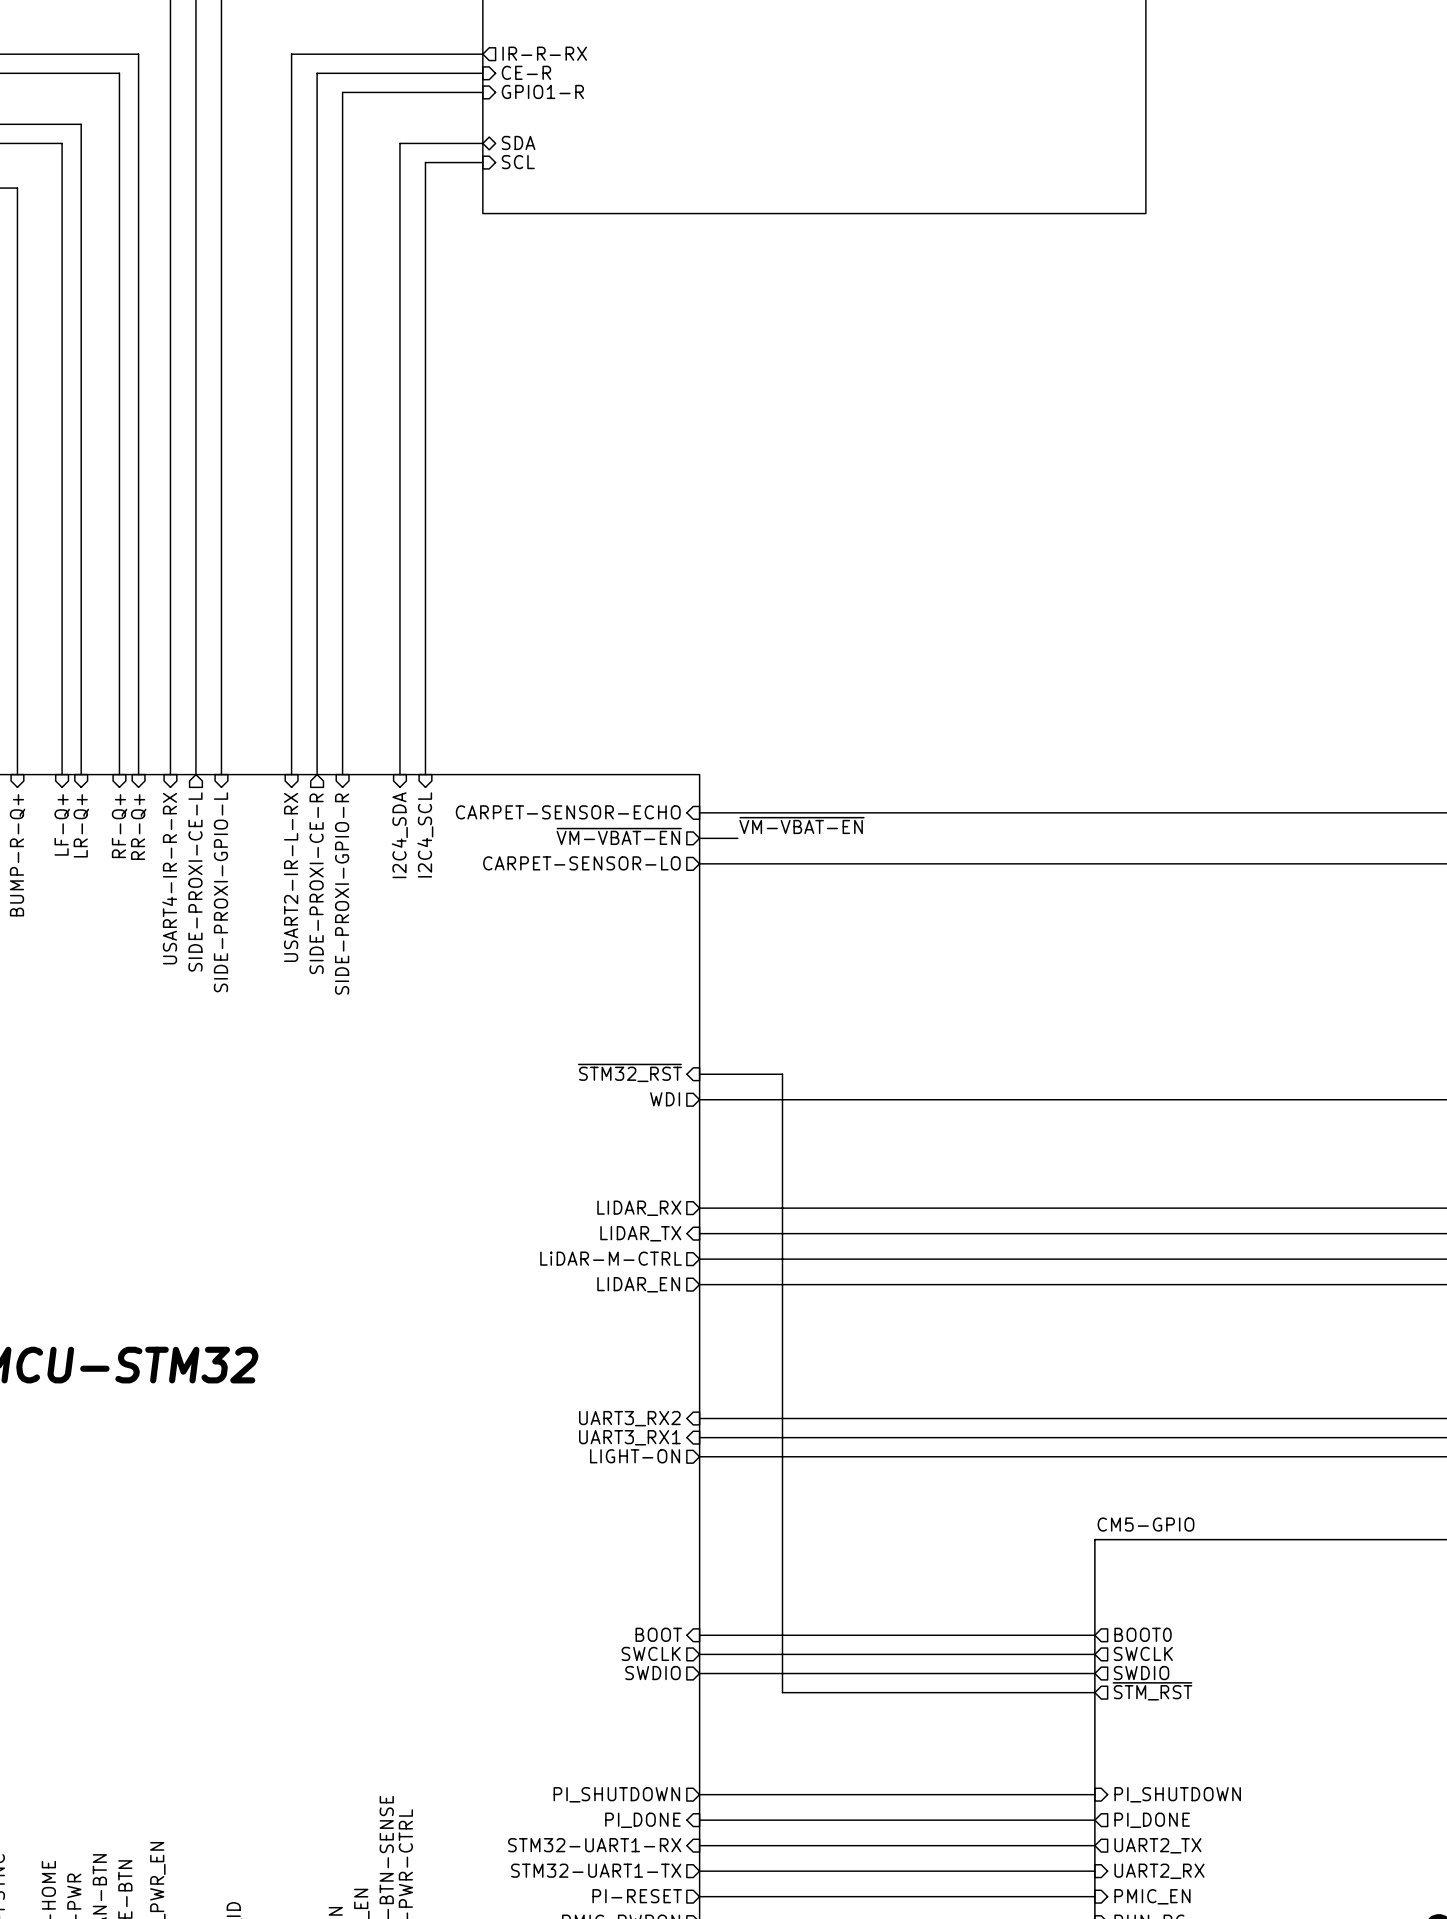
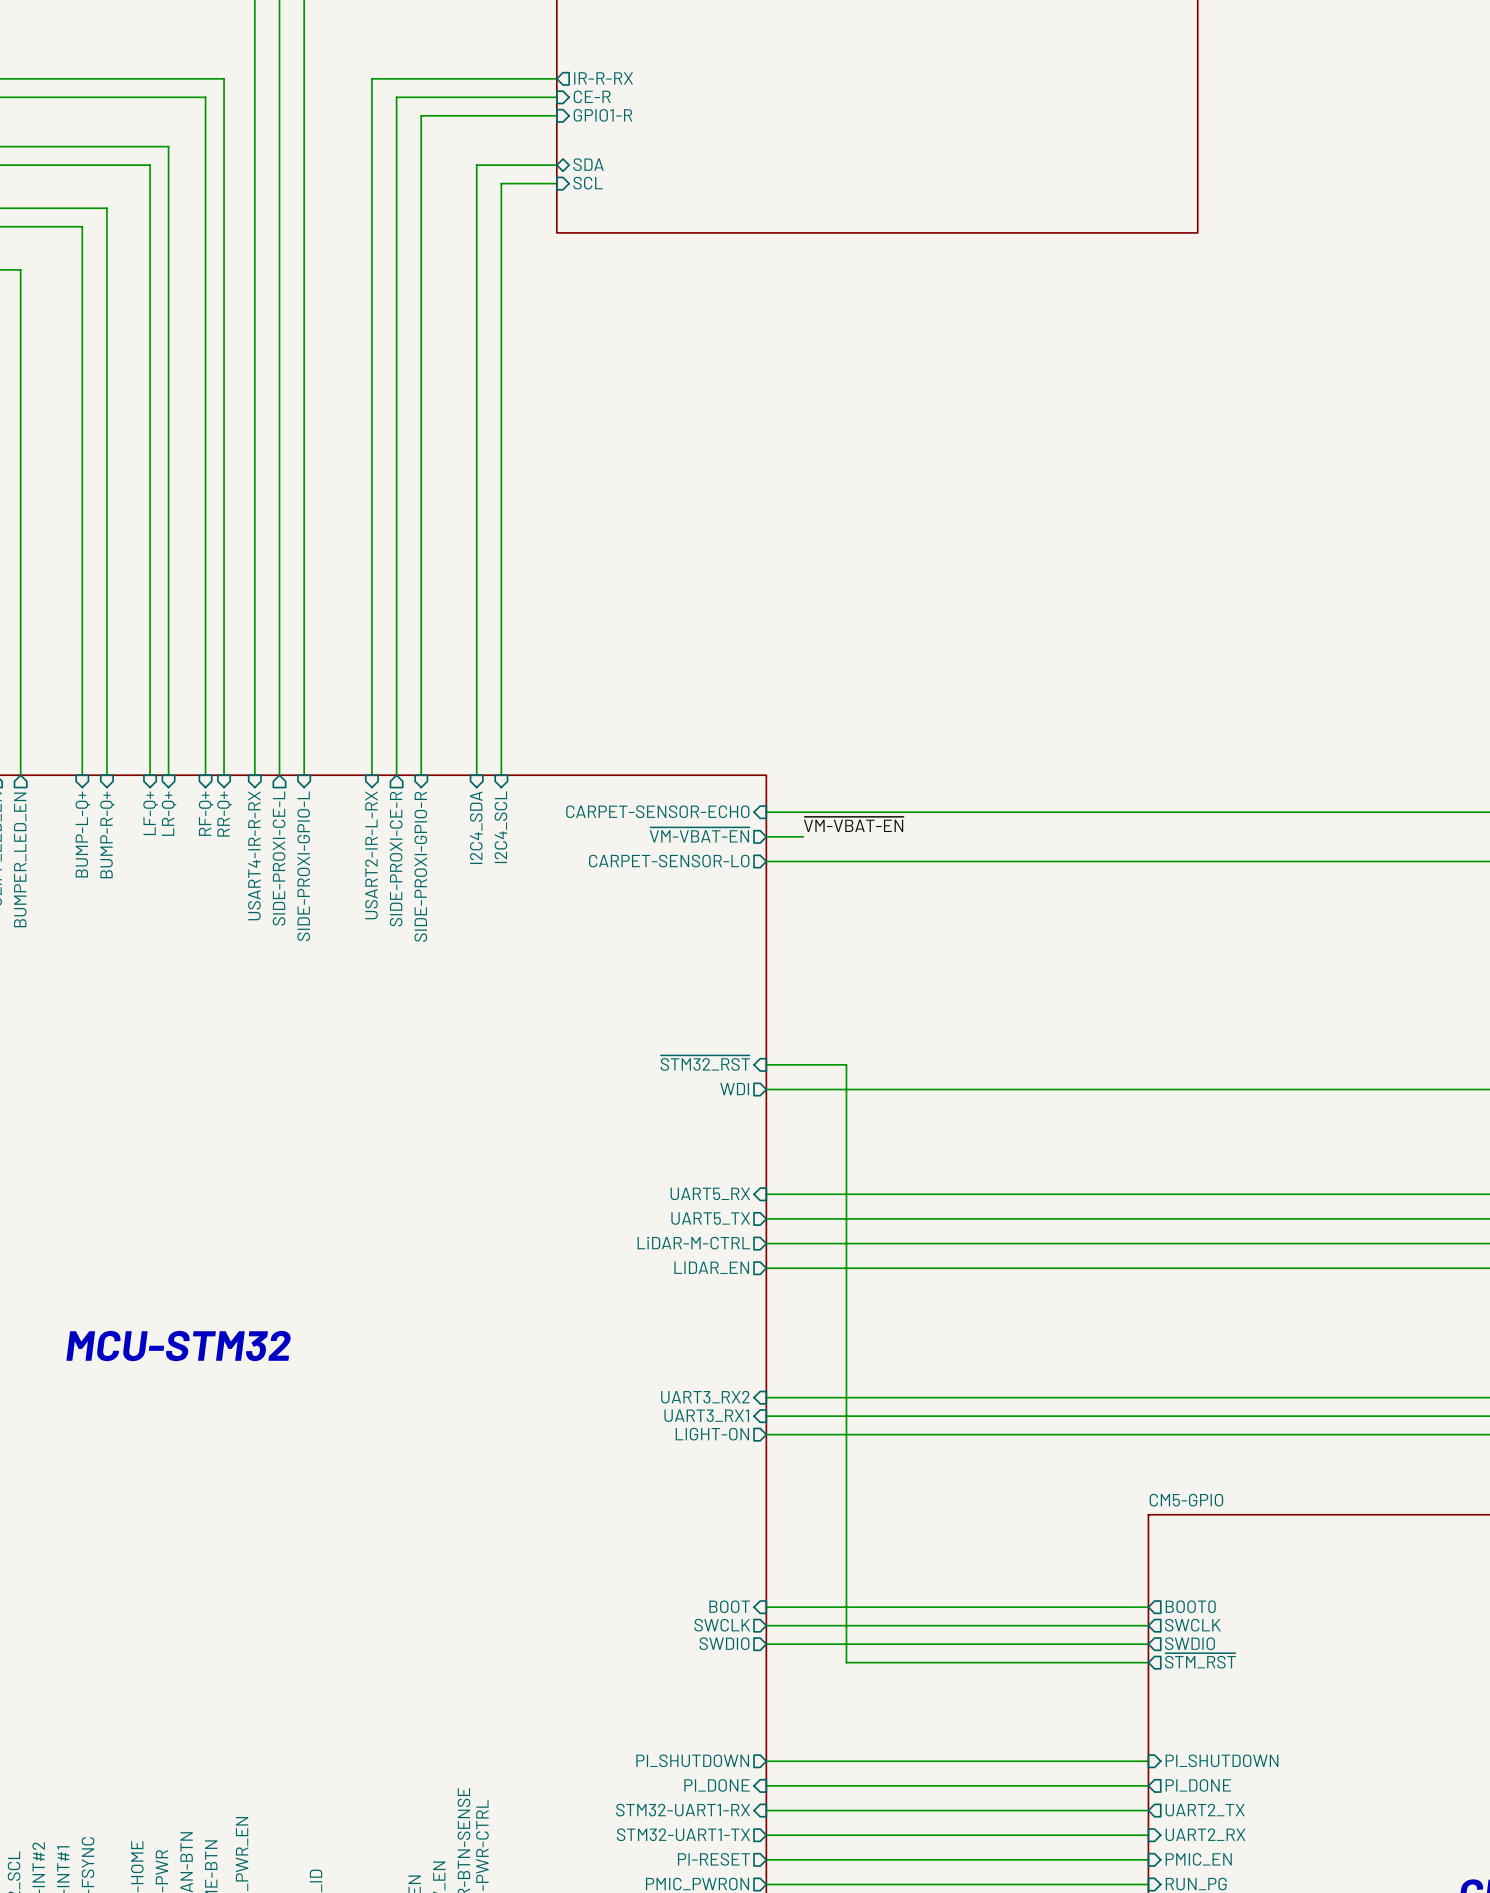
sheet pin shape: output (639, 1208) -> input (710, 1193)
sheet pin: LIDAR_RX (639, 1208) -> UART5_RX (710, 1193)
sheet pin shape: input (640, 1233) -> output (710, 1218)
sheet pin: LIDAR_TX (640, 1233) -> UART5_TX (710, 1218)

